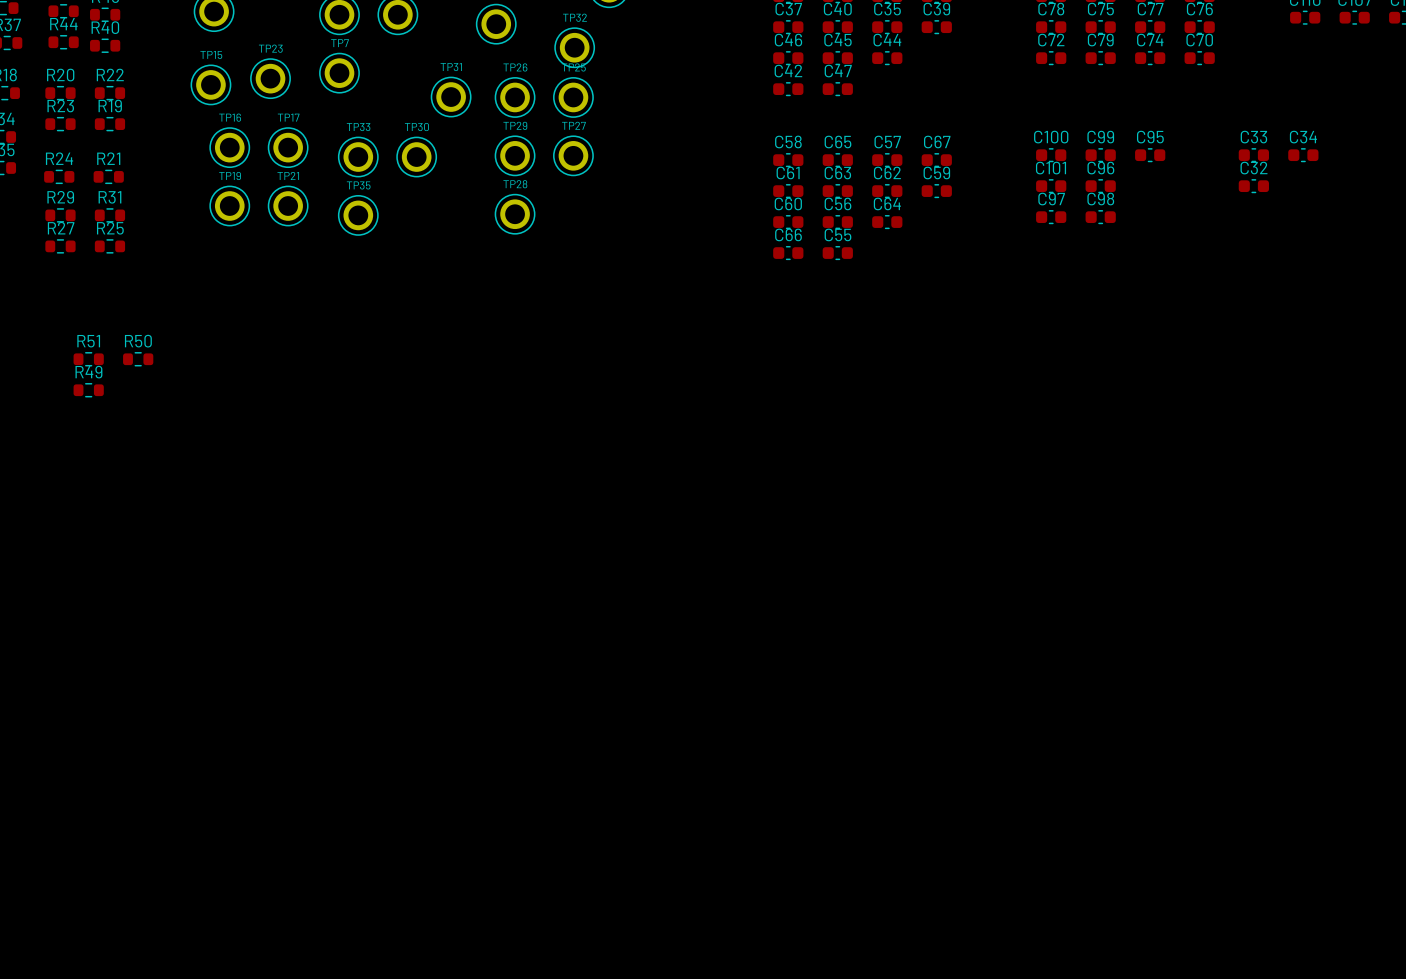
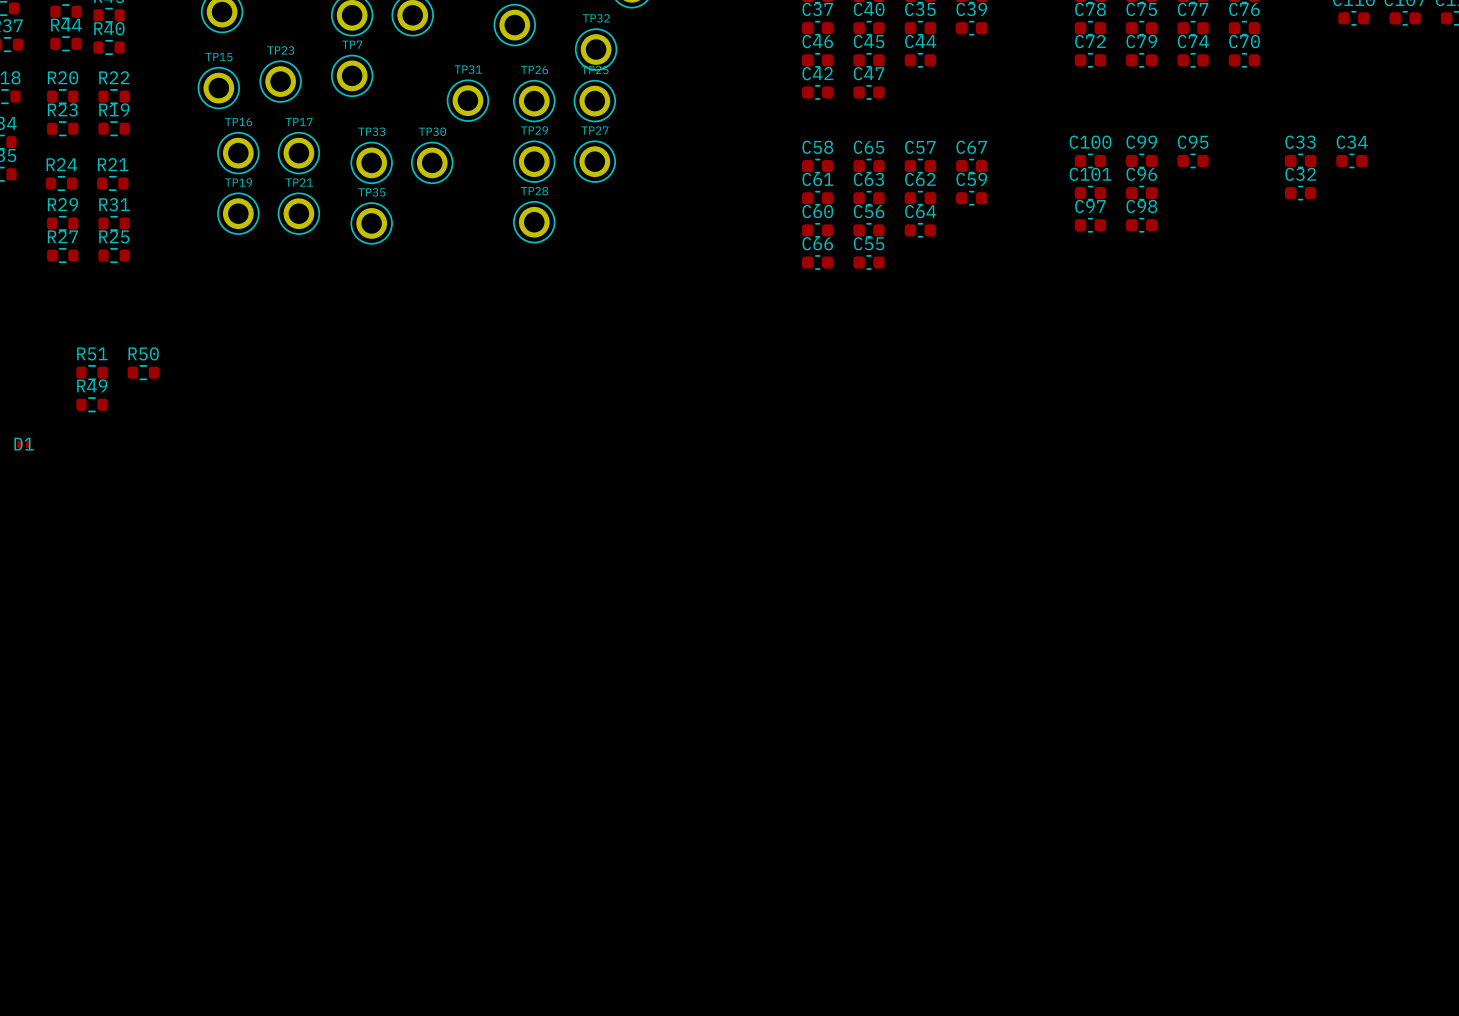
D1: none -> (23, 444)

